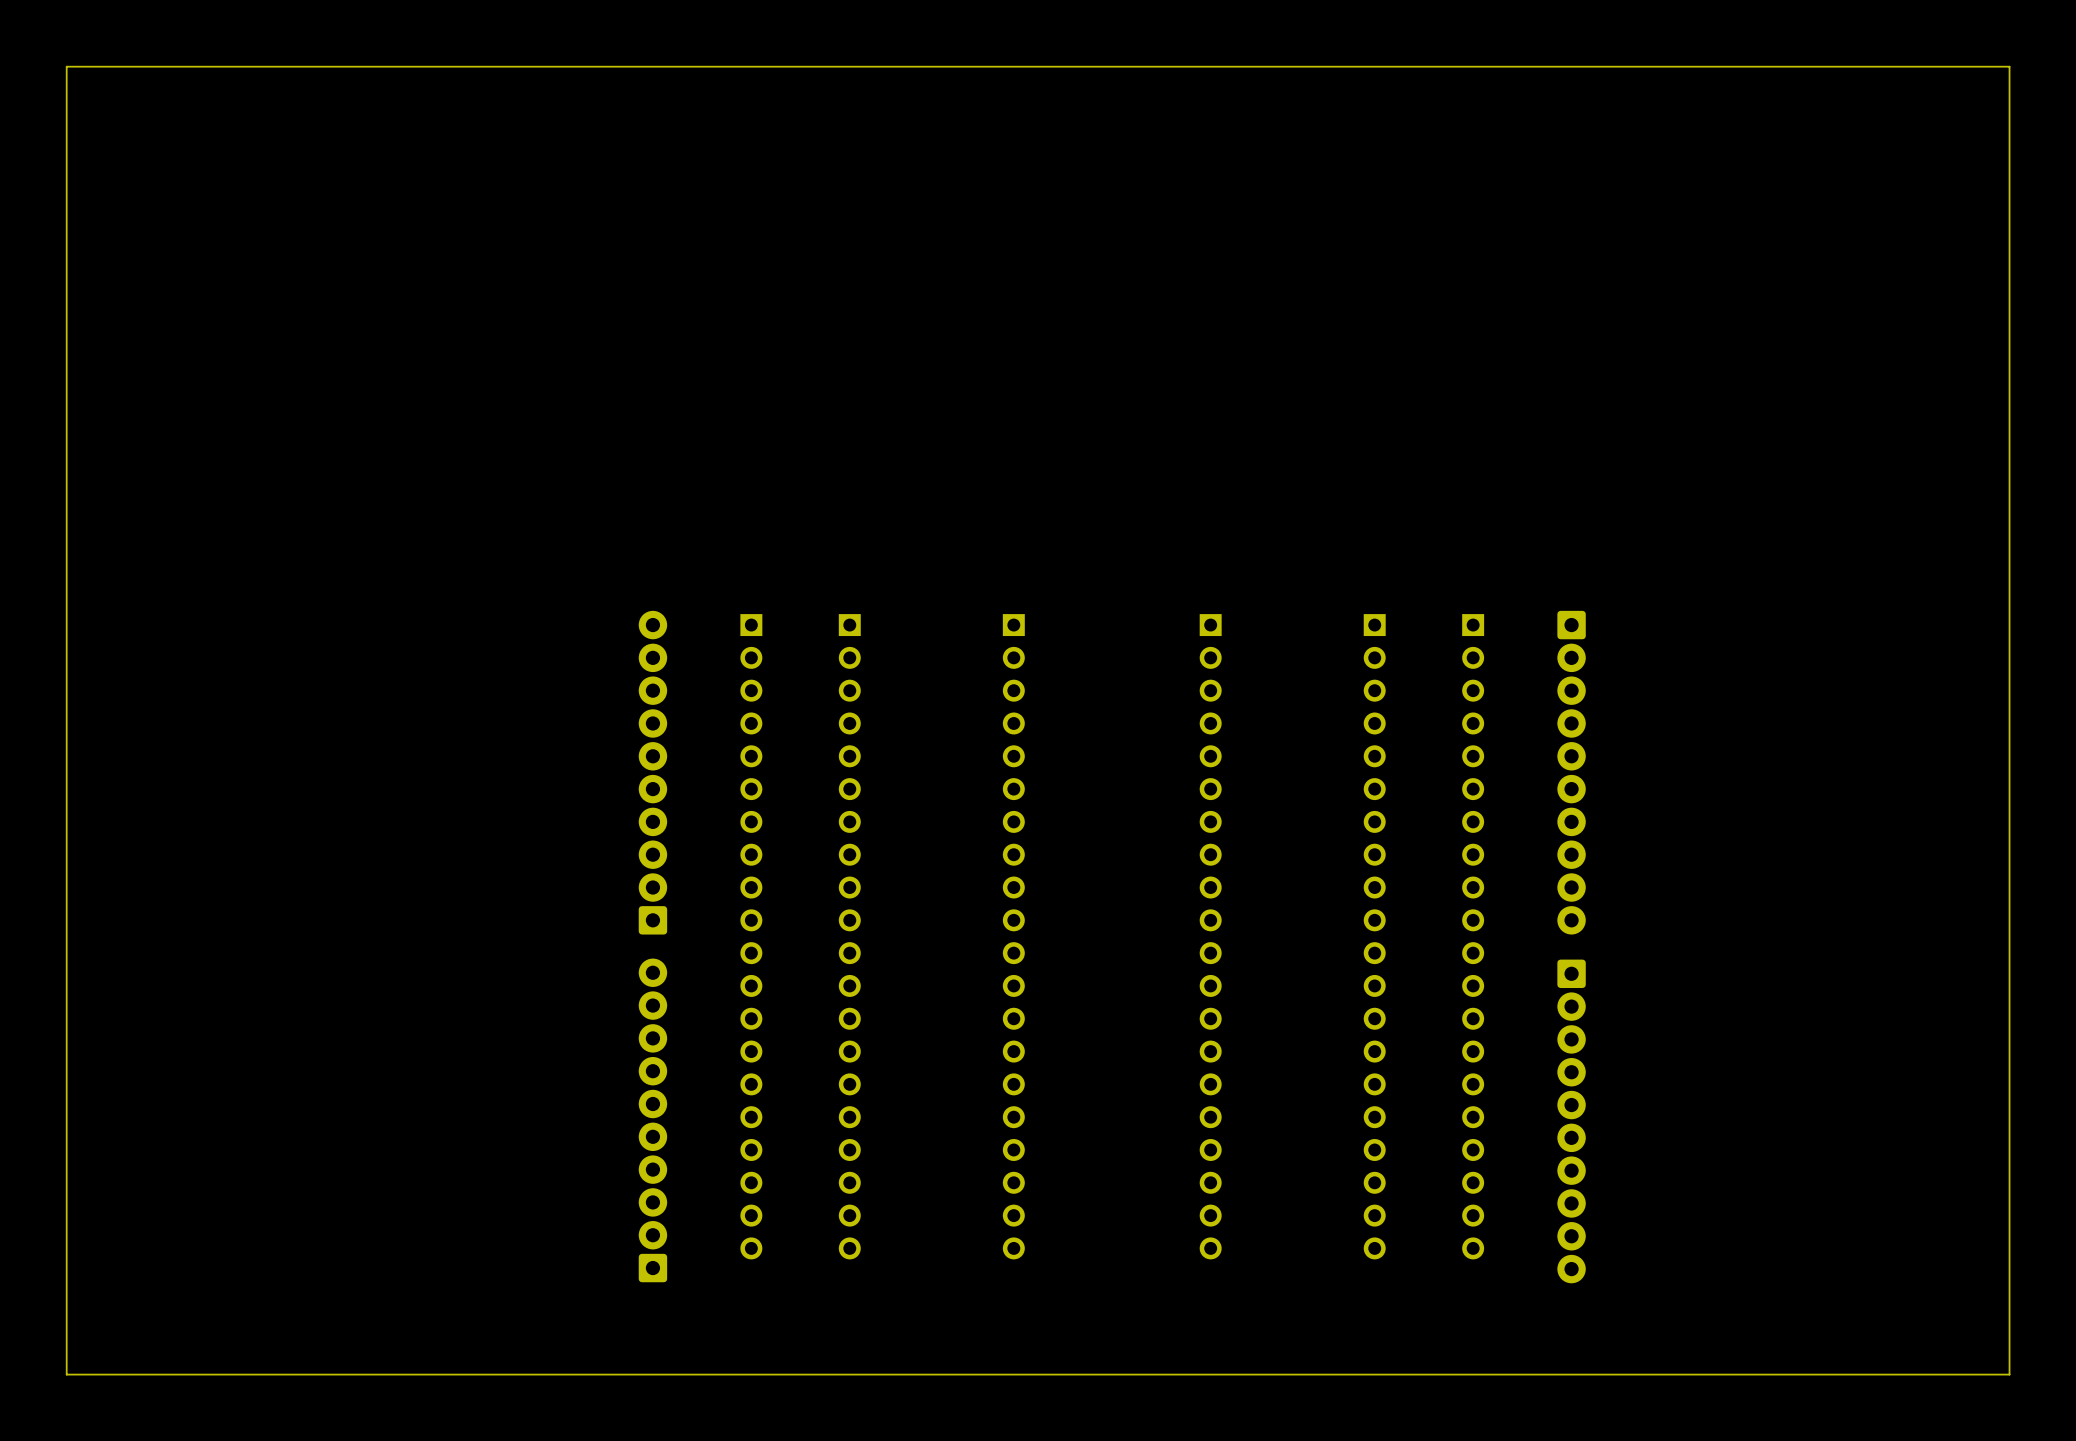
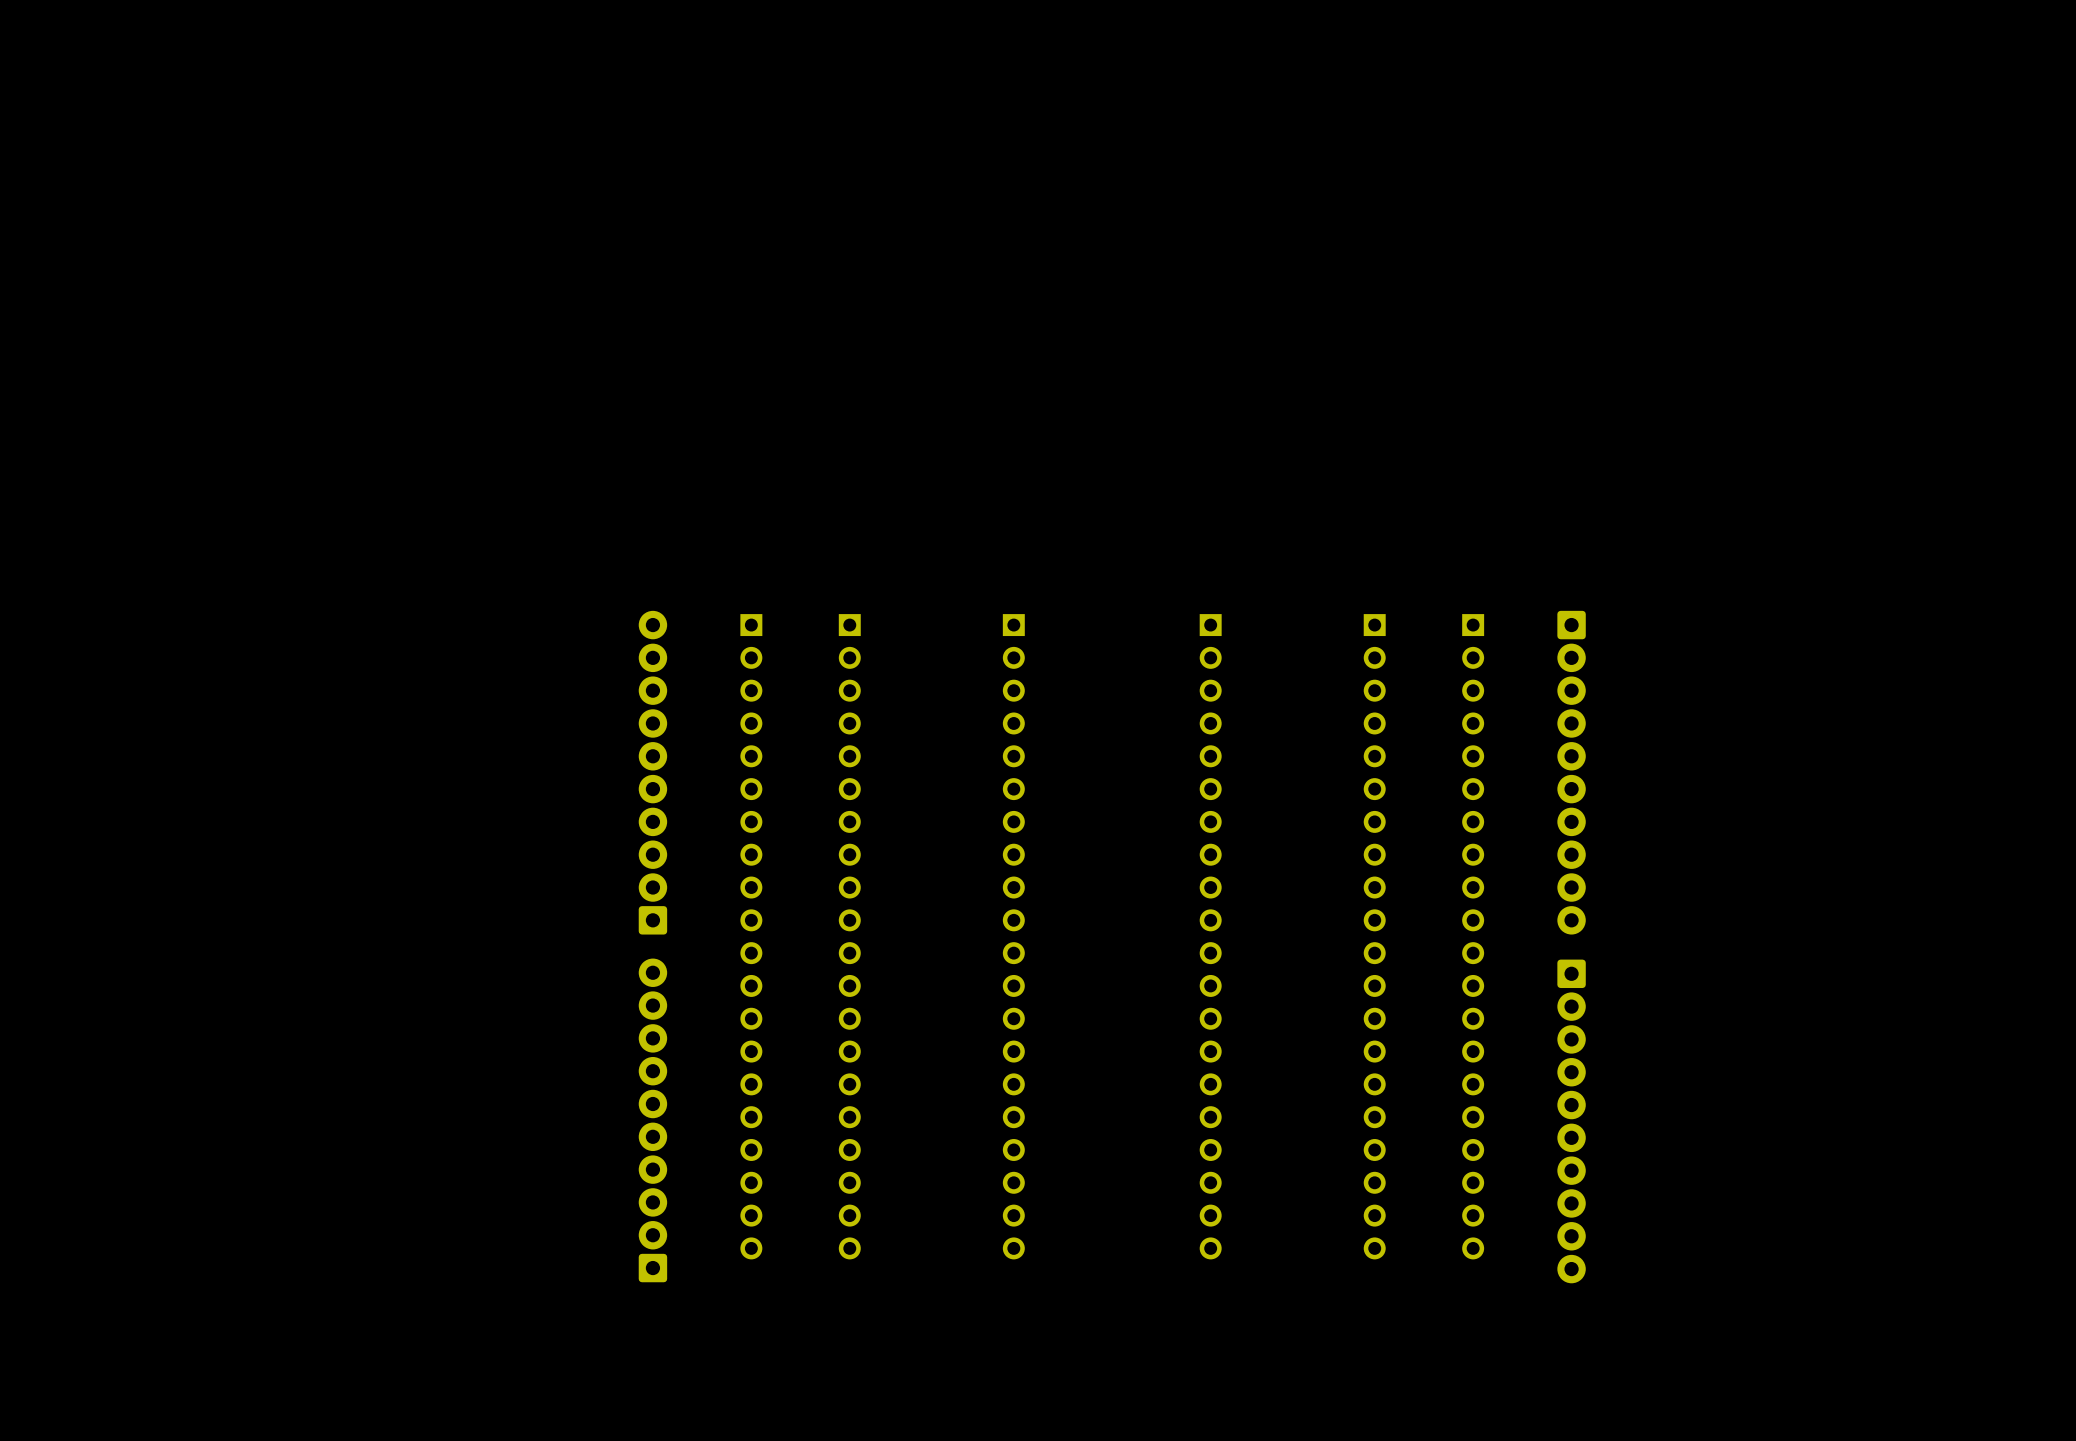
board edge: (2009, 66) (66, 66) (66, 1374) (2009, 1374) (2009, 66) -> none

